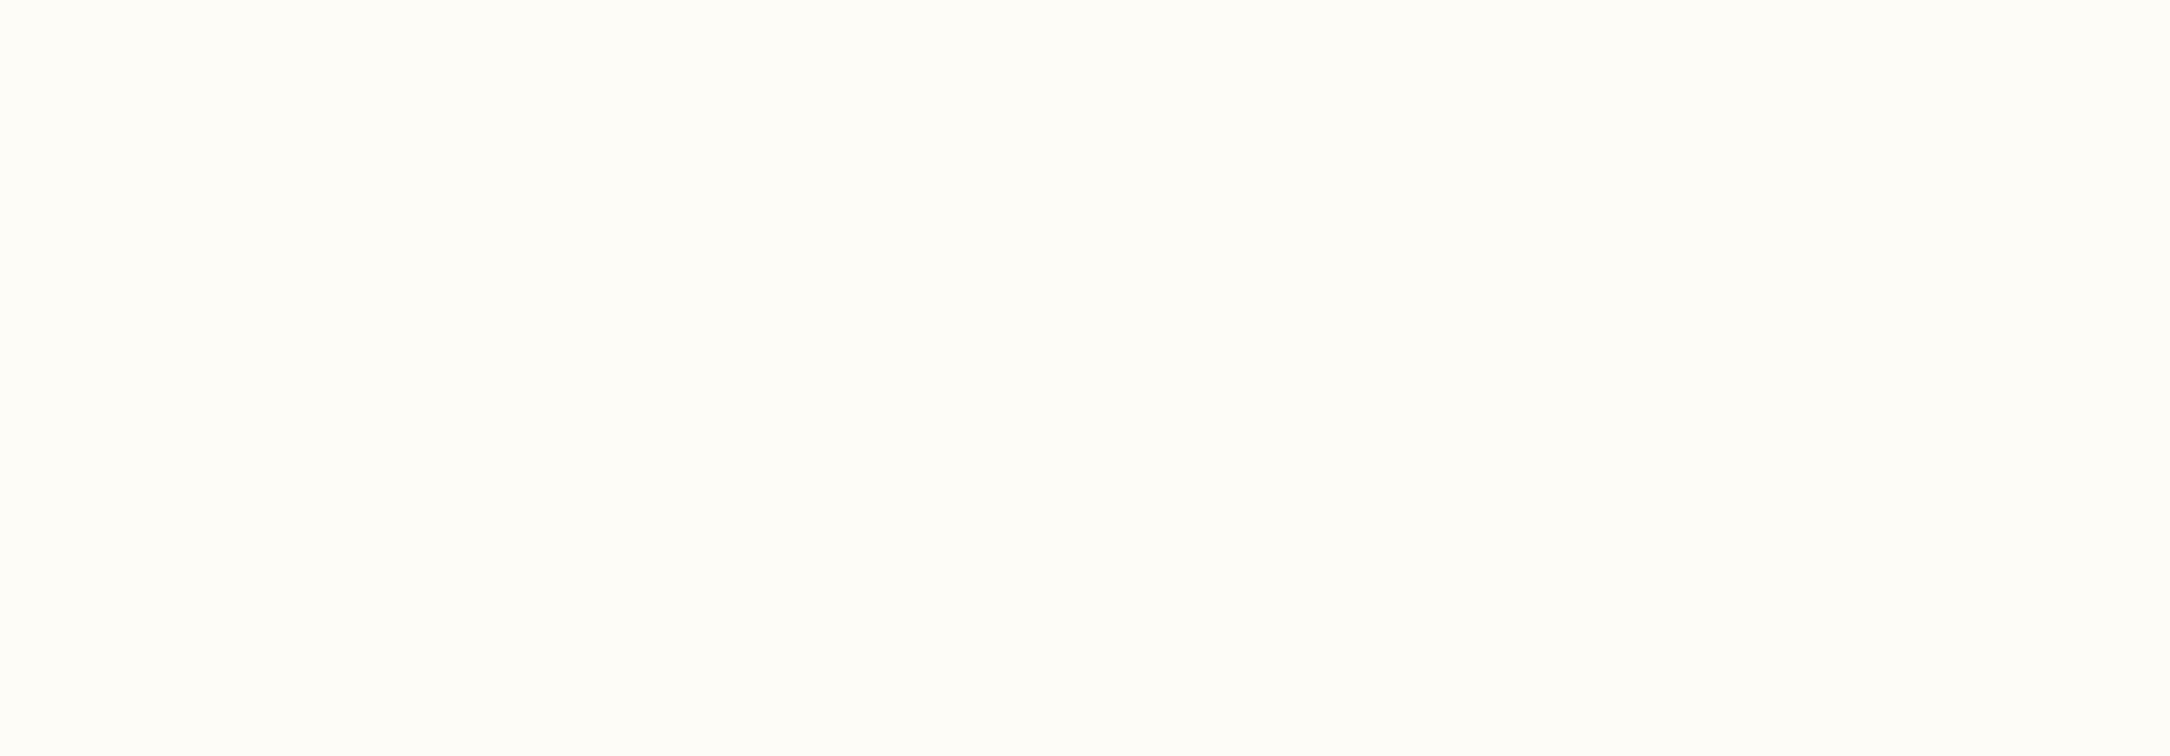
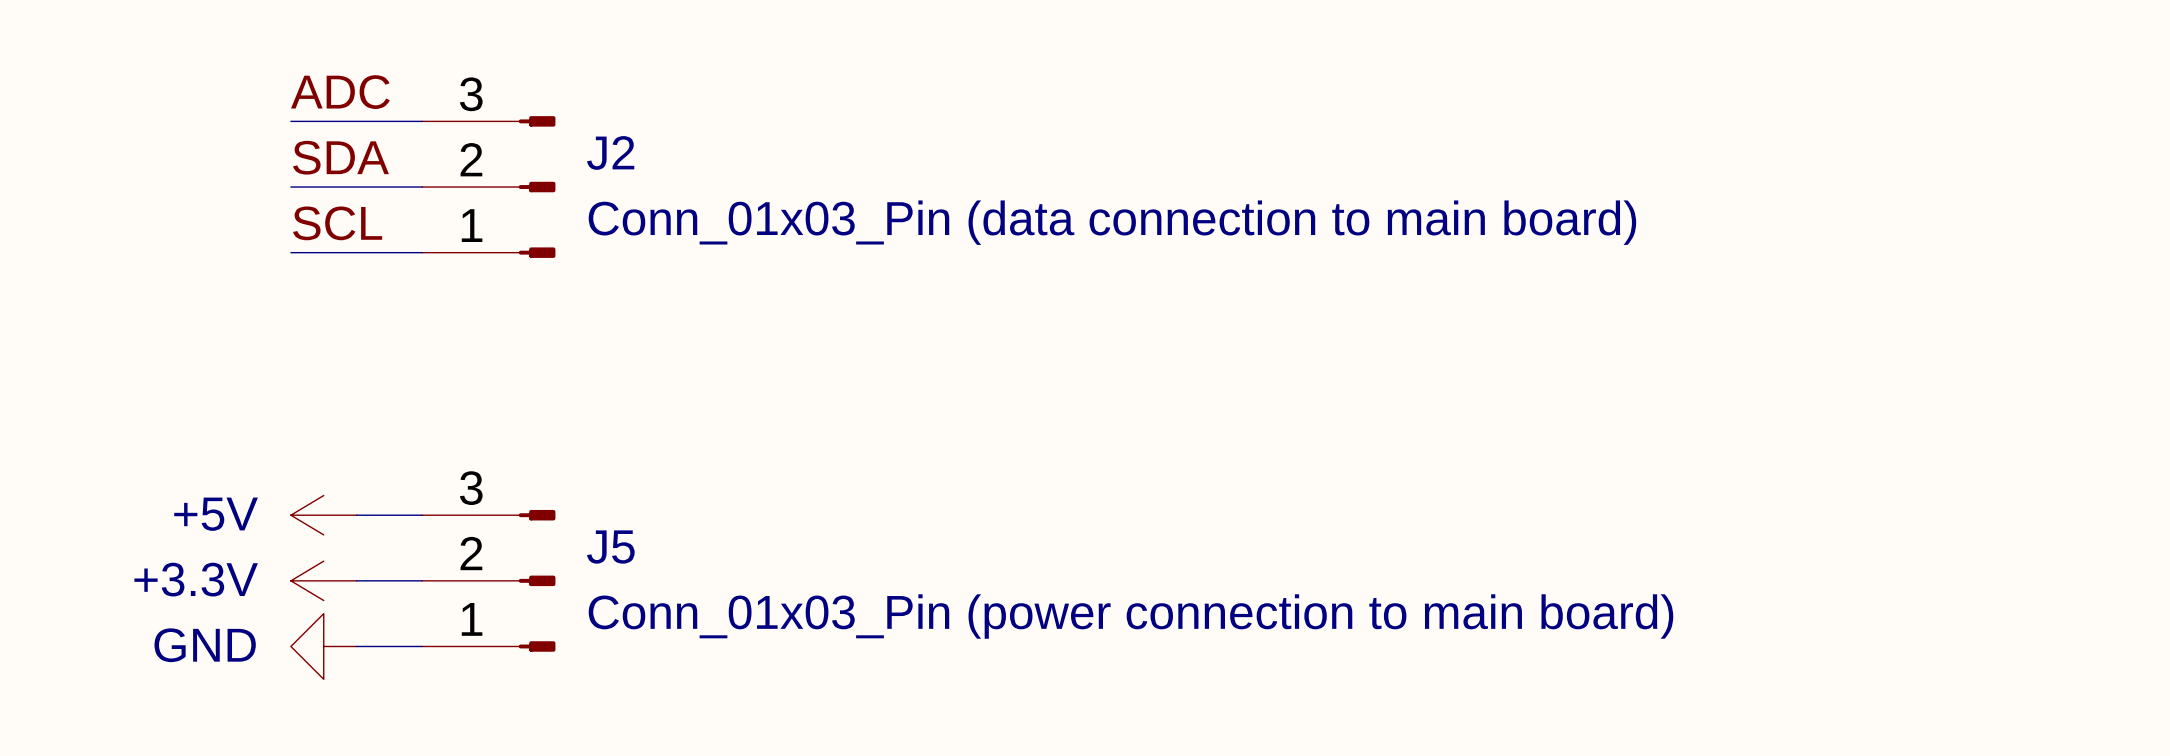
label: none -> ADC (340, 92)
wire: none -> (290, 121) (422, 121)
label: none -> SDA (341, 157)
wire: none -> (290, 187) (422, 187)
J2: none -> Conn_01x03_Pin (data connection to main board) (488, 187)
label: none -> SCL (337, 223)
wire: none -> (290, 252) (422, 252)
power symbol: none -> +5V (323, 515)
wire: none -> (356, 515) (422, 515)
power symbol: none -> +3.3V (323, 580)
wire: none -> (356, 580) (422, 580)
J5: none -> Conn_01x03_Pin (power connection to main board) (488, 580)
power symbol: none -> GND (323, 646)
wire: none -> (356, 646) (422, 646)

